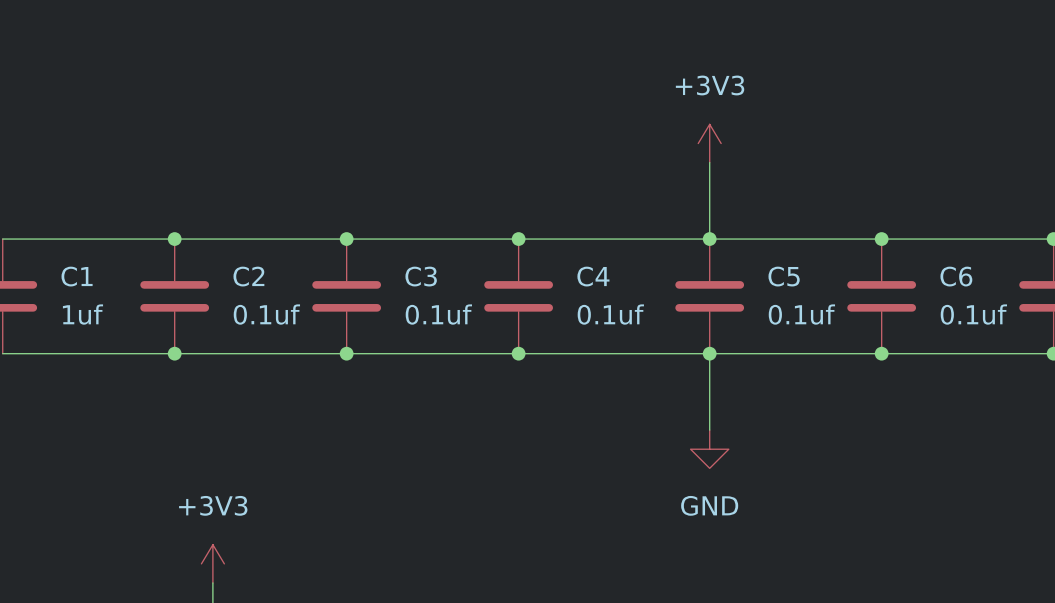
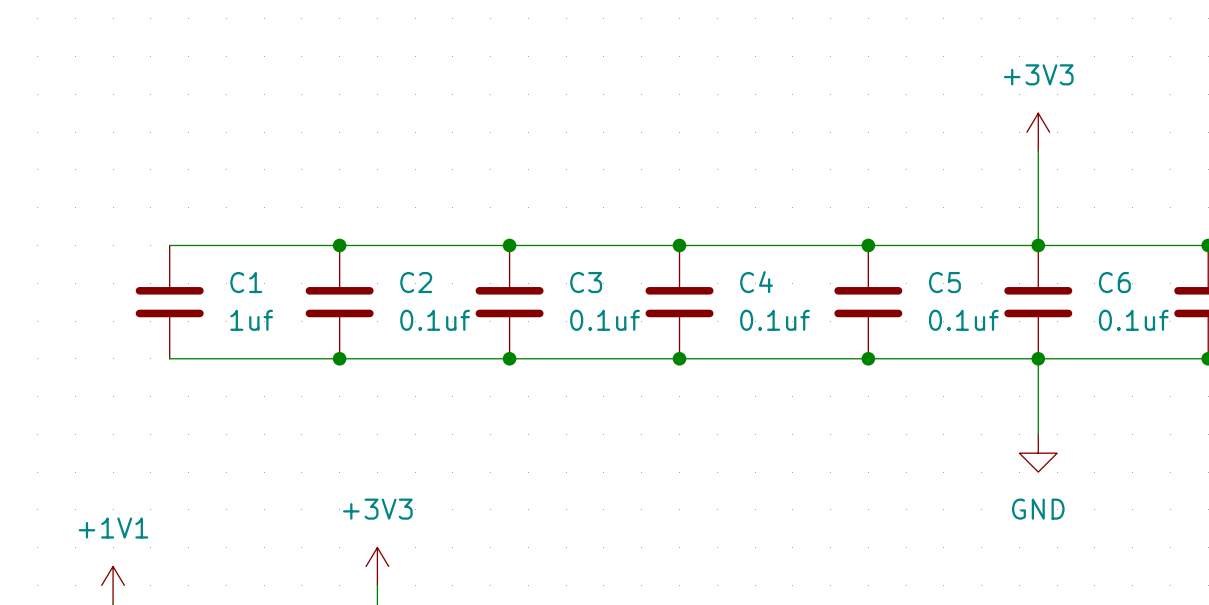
power symbol position: +3V3 (709, 143) -> +3V3 (1038, 132)
wire: none -> (1038, 151) (1038, 245)
wire: (709, 162) (709, 239) -> none
wire: (709, 353) (709, 430) -> (1038, 358) (1038, 434)
power symbol position: GND (709, 449) -> GND (1038, 453)

